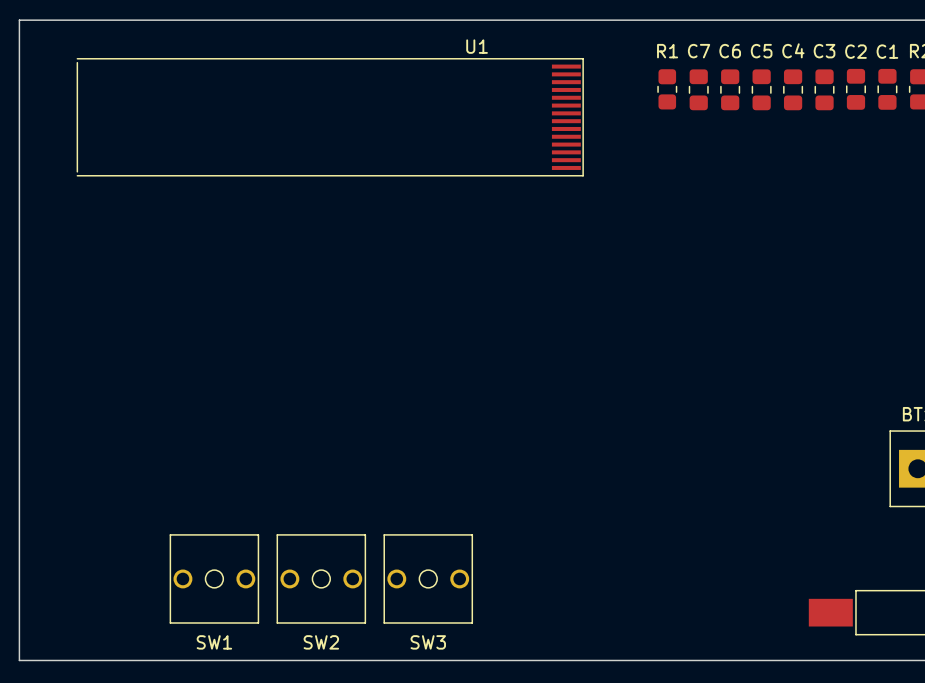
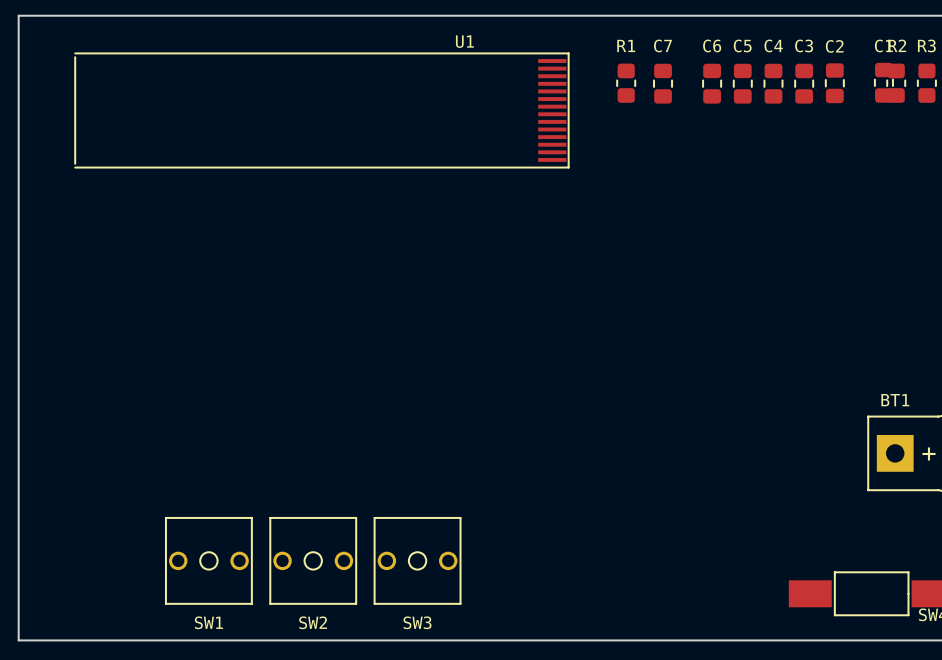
R1 position: (667, 89) -> (626, 83)
C7 position: (698, 89) -> (663, 83)
C1 position: (887, 89) -> (883, 82)

